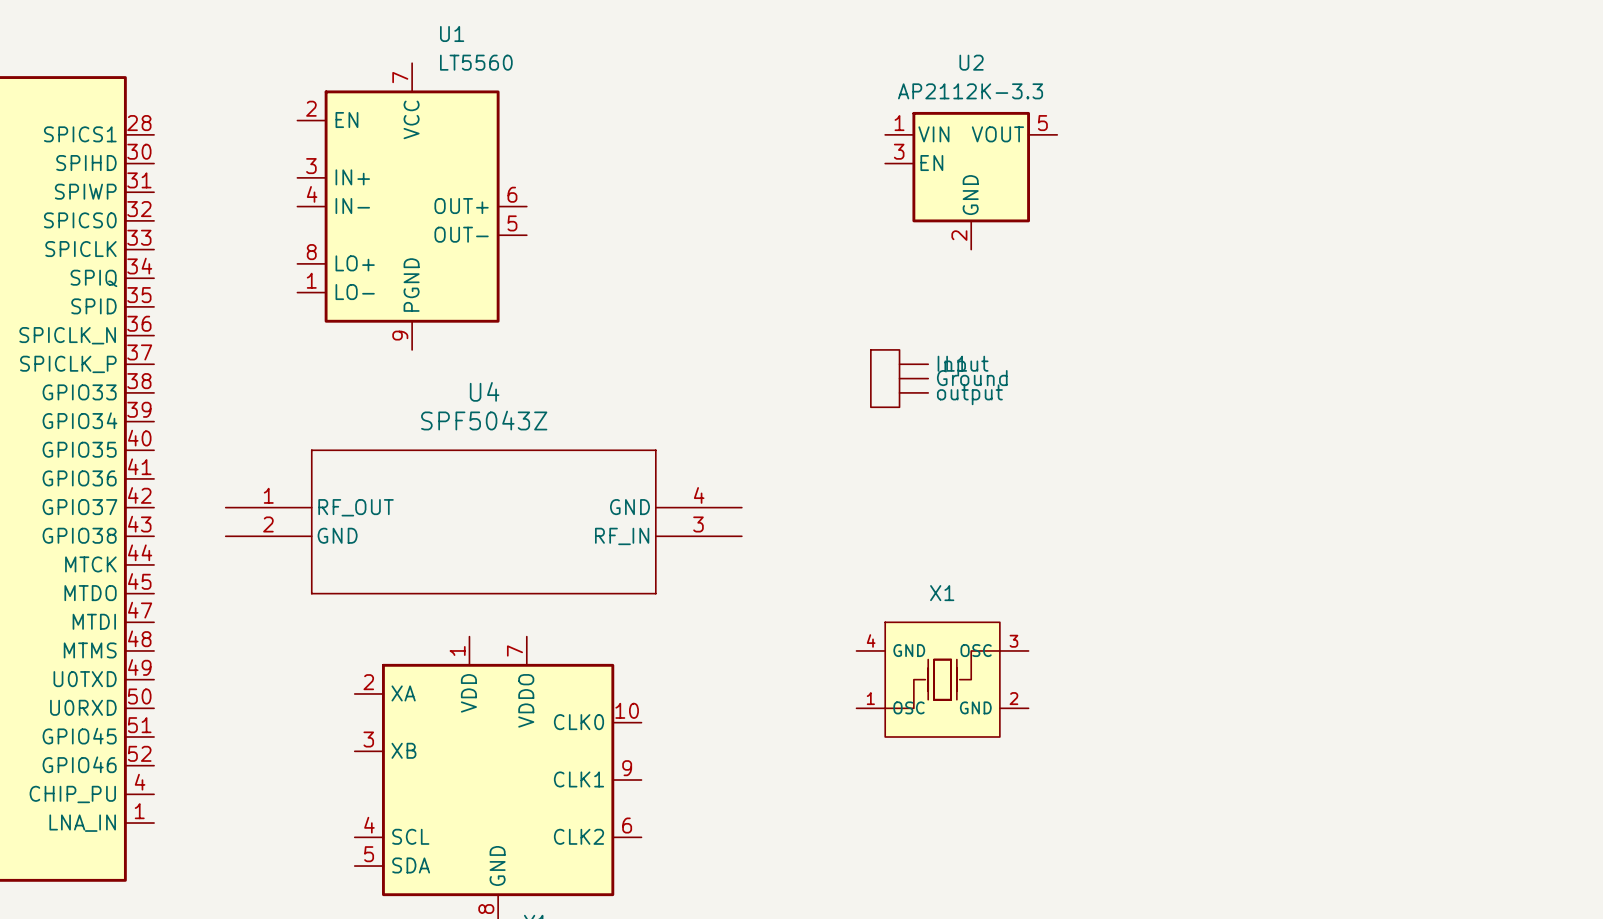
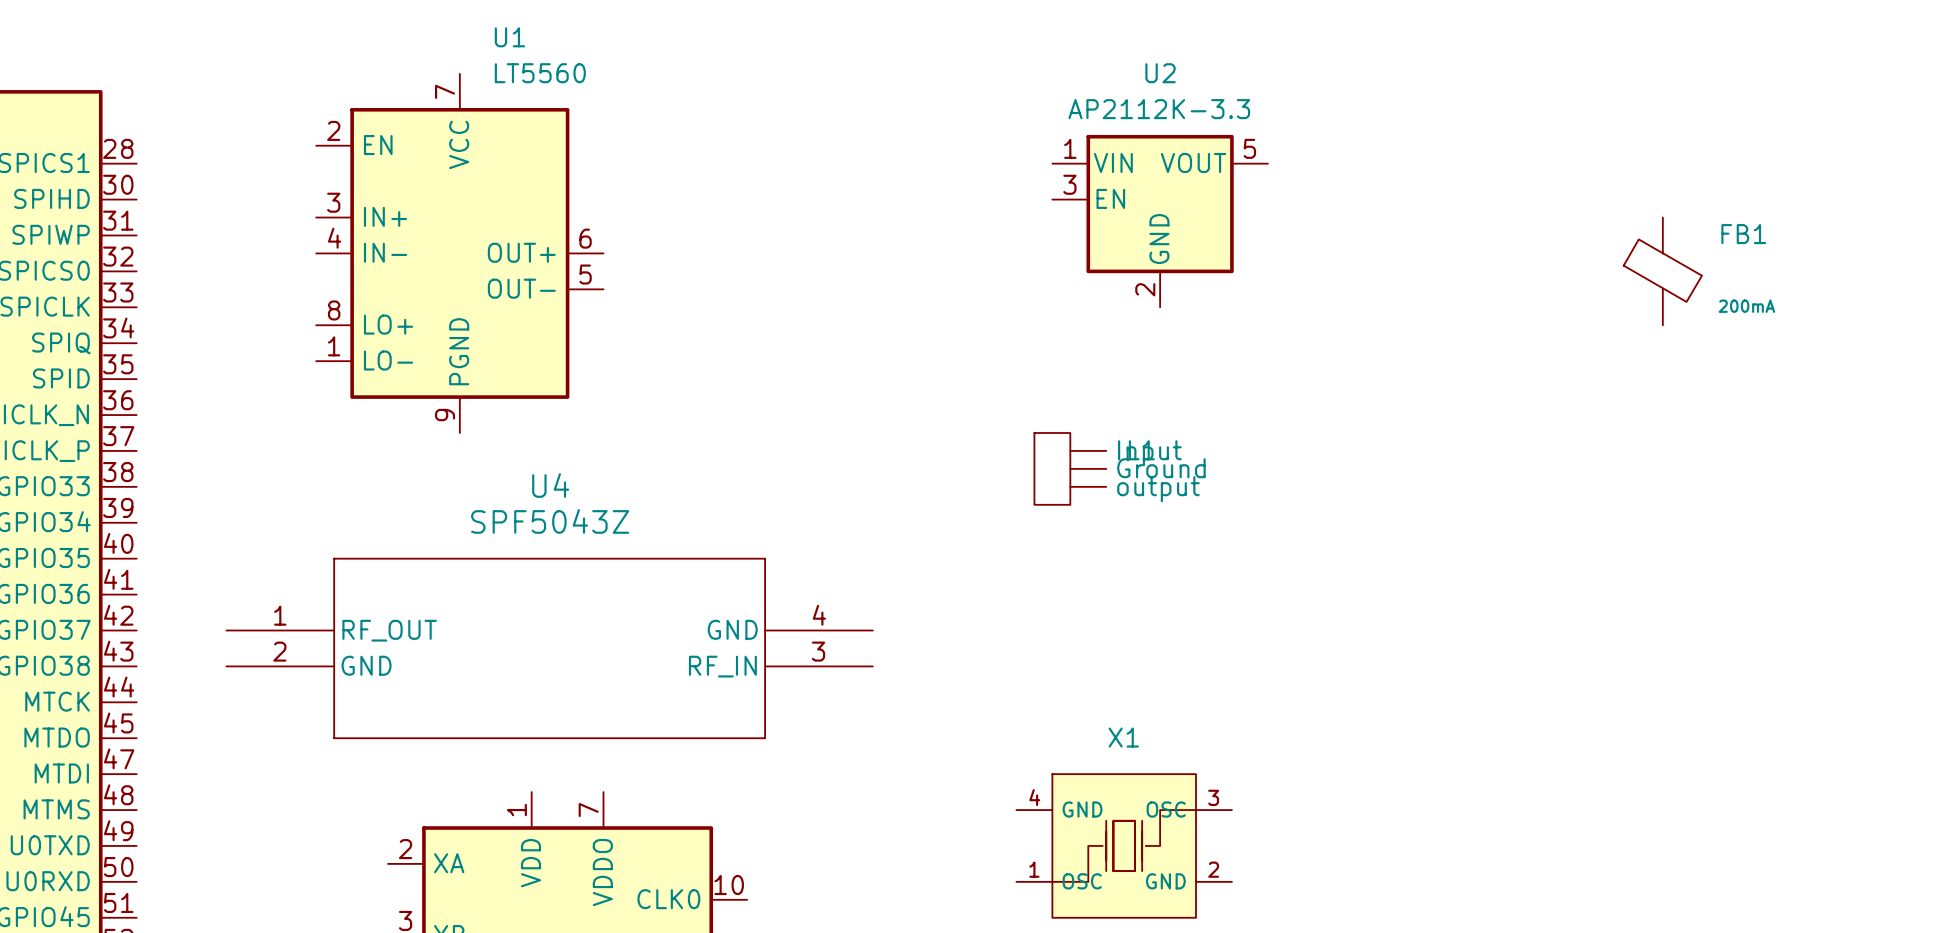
FB1: none -> (1662, 271)

